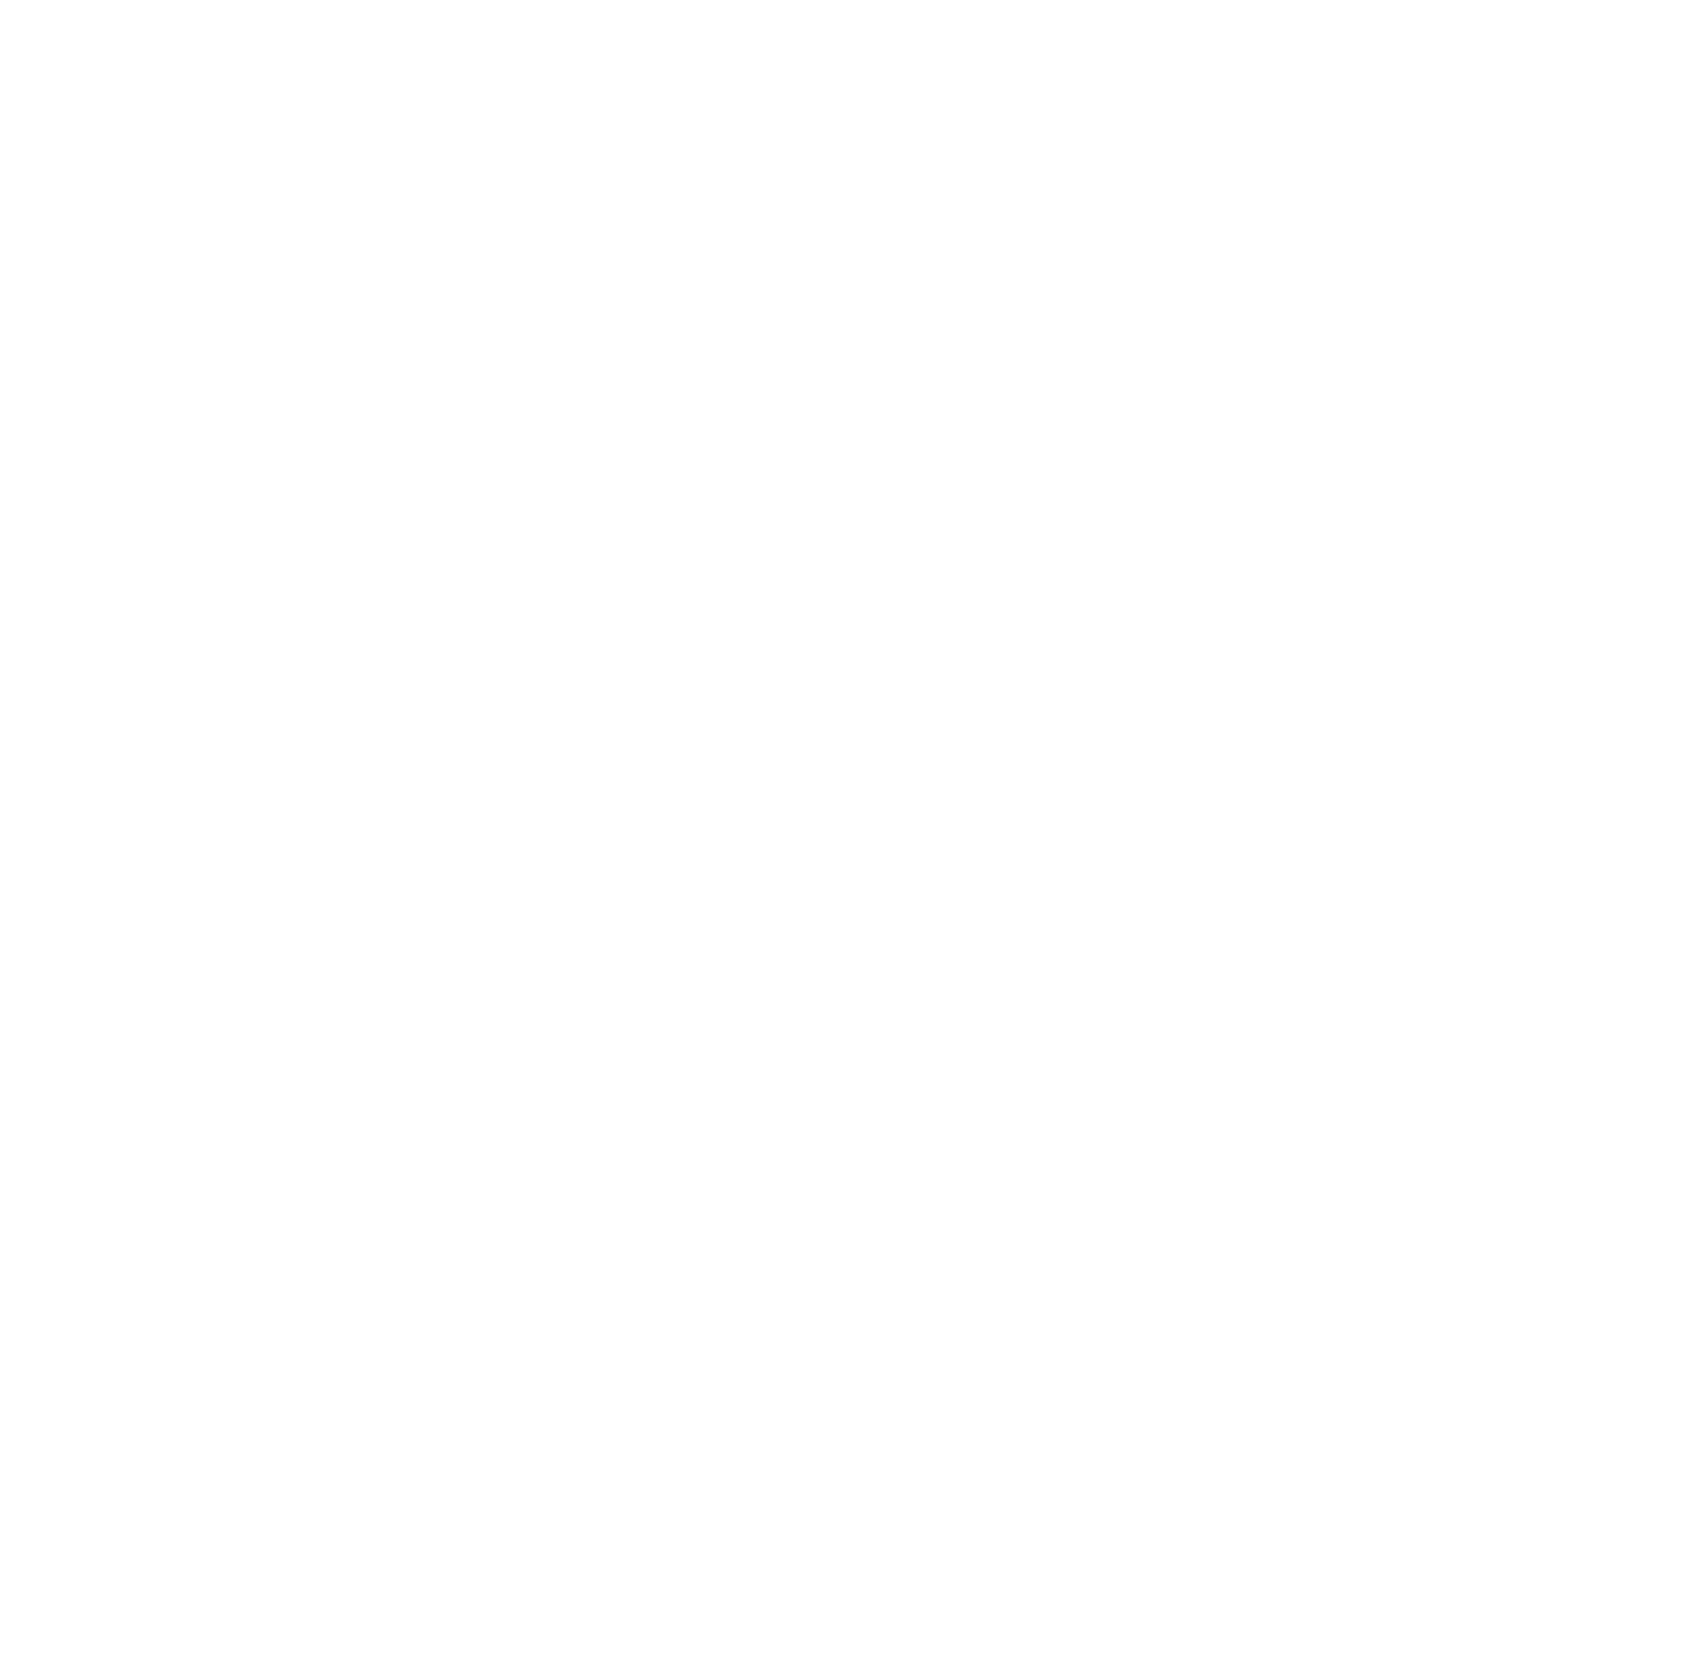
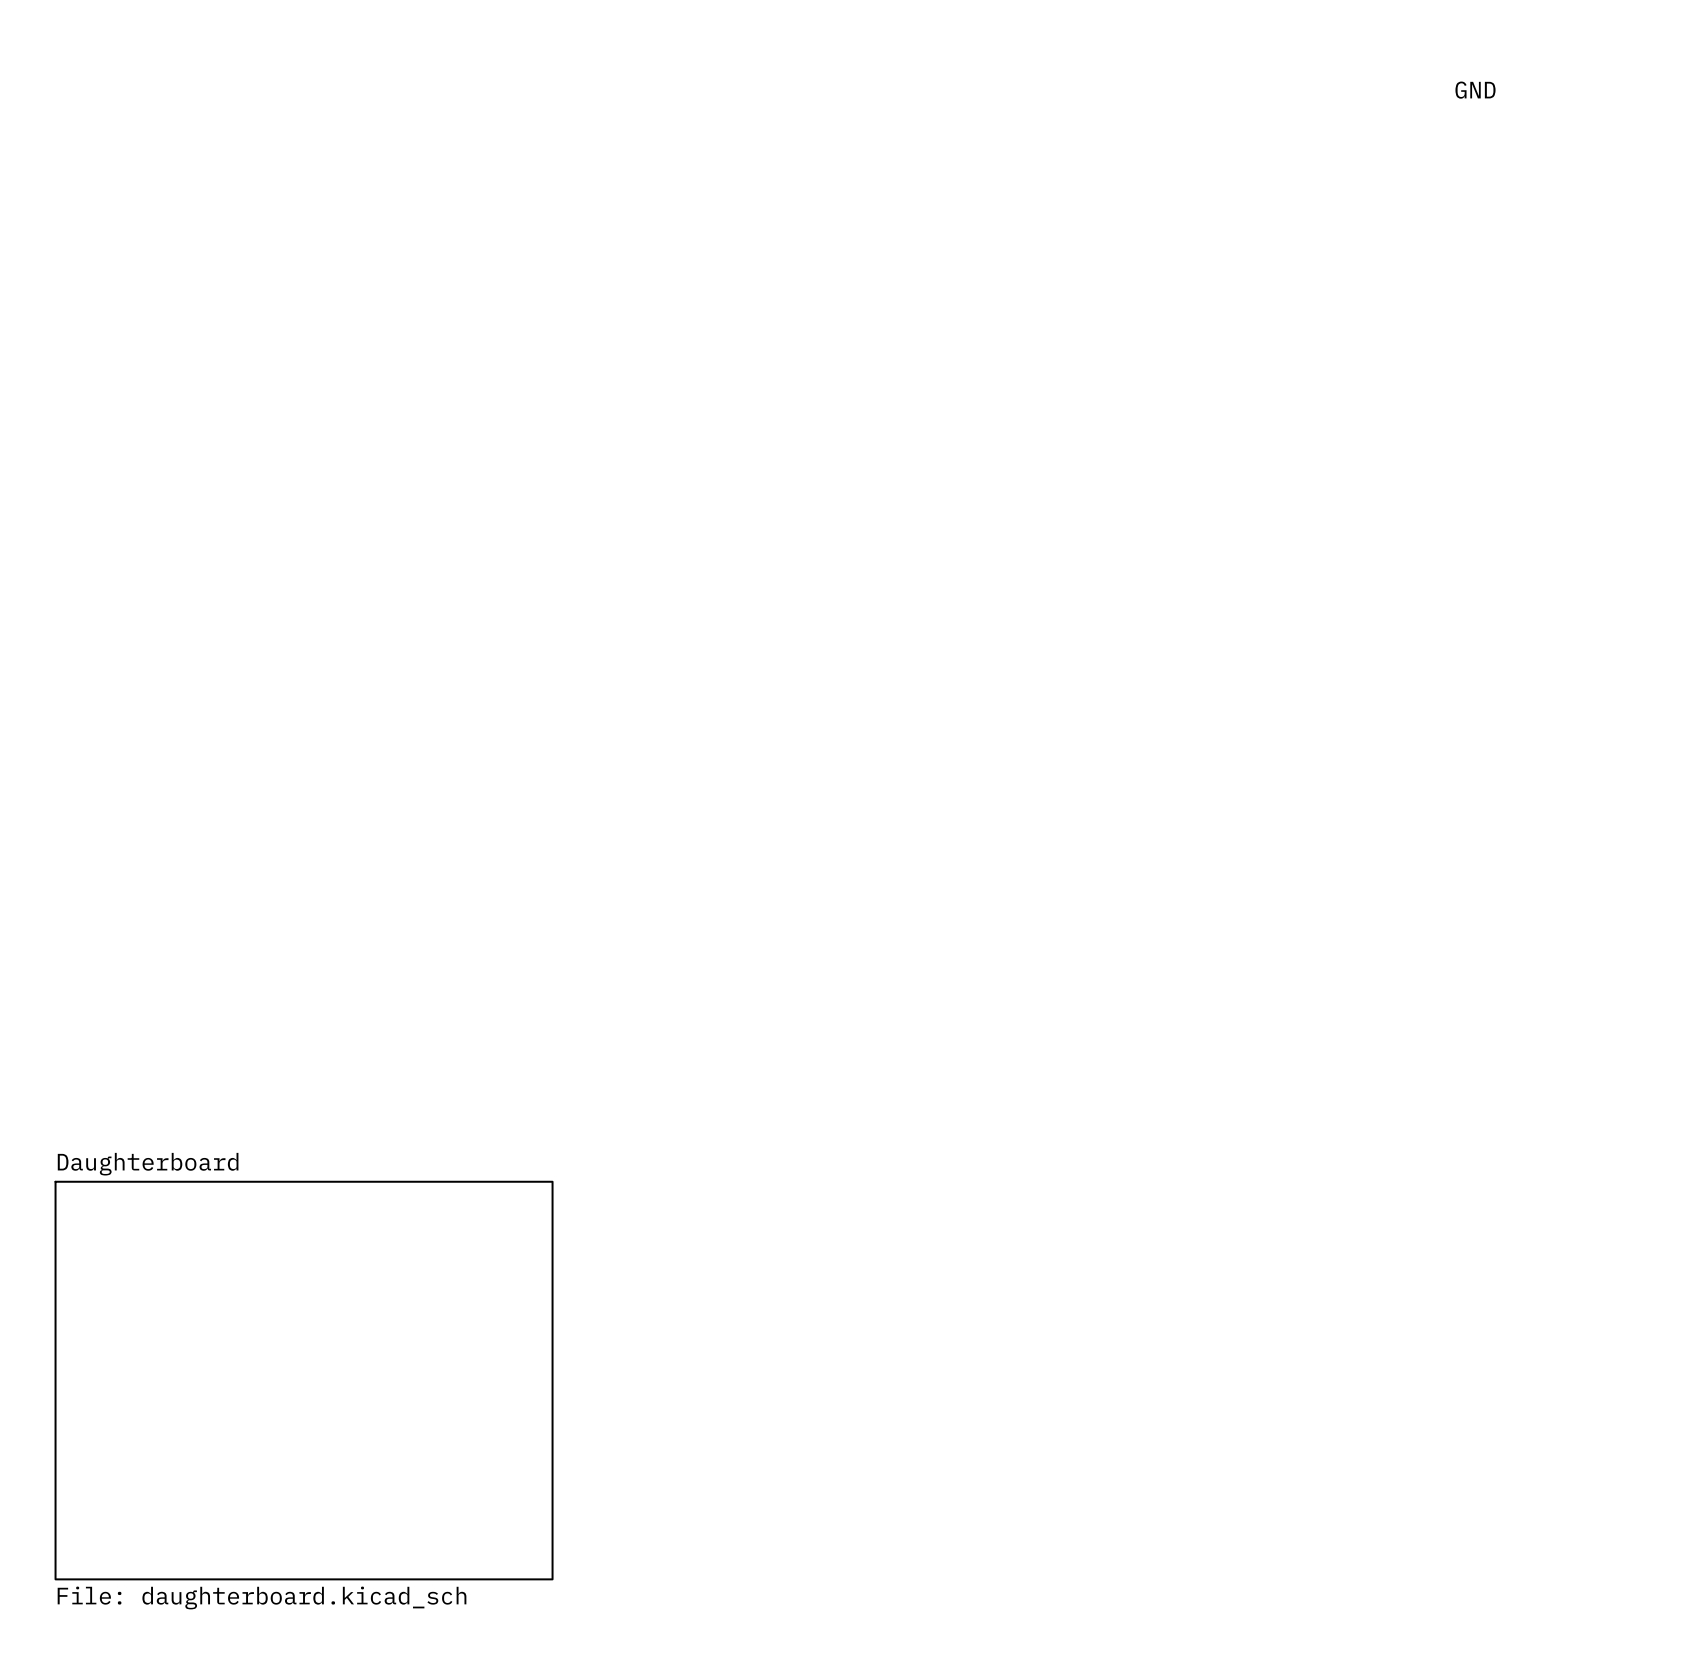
label: none -> GND (1475, 90)
sheet Daughterboard: none -> File: daughterboard.kicad_sch (304, 1380)

